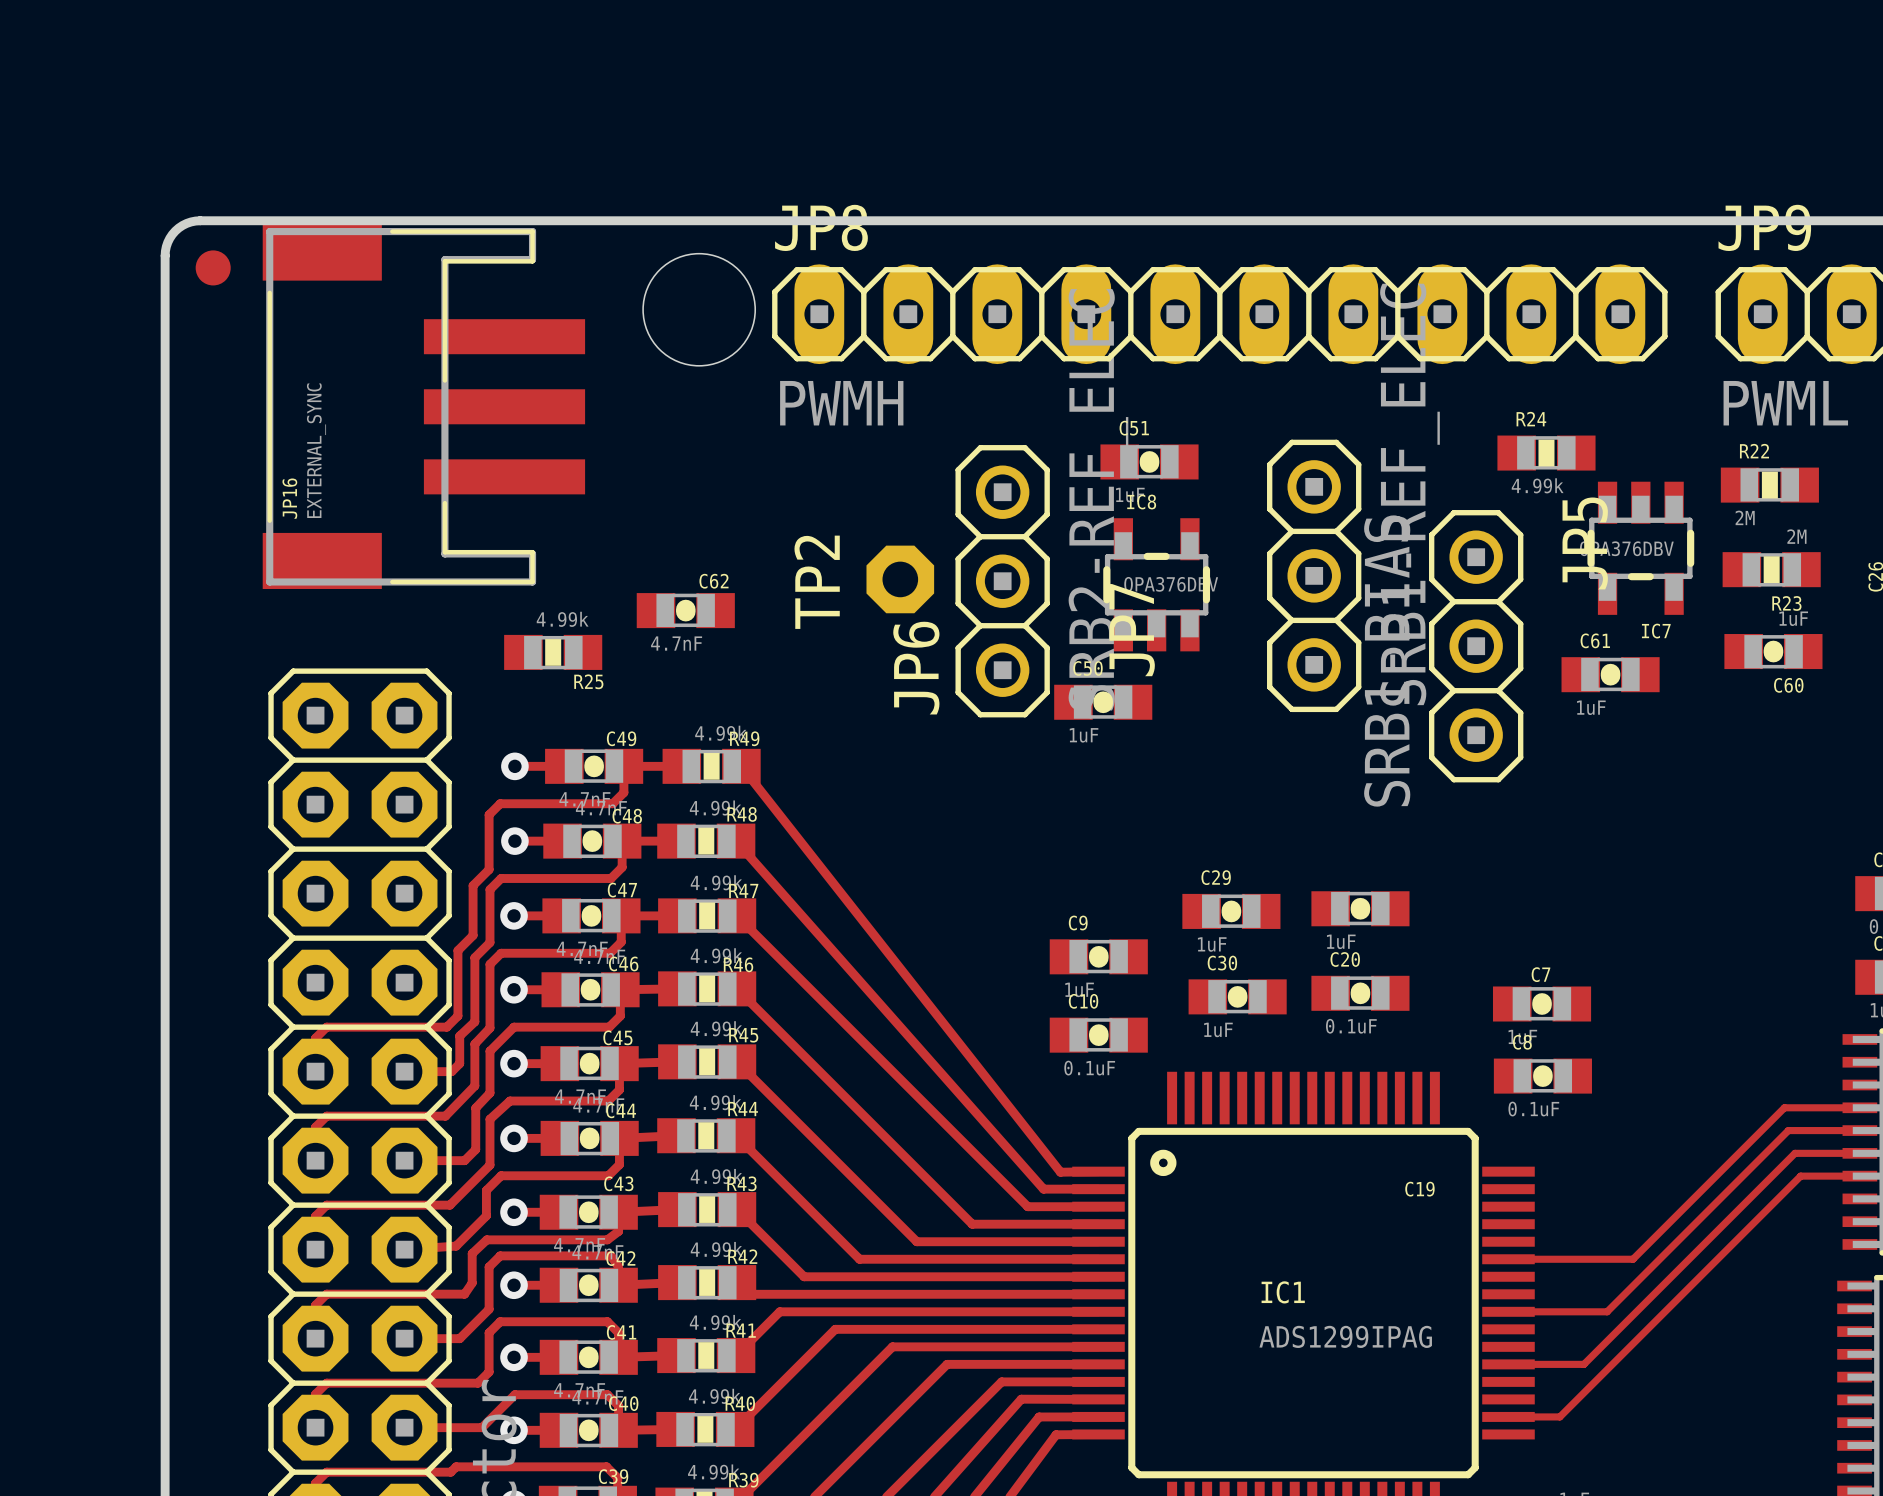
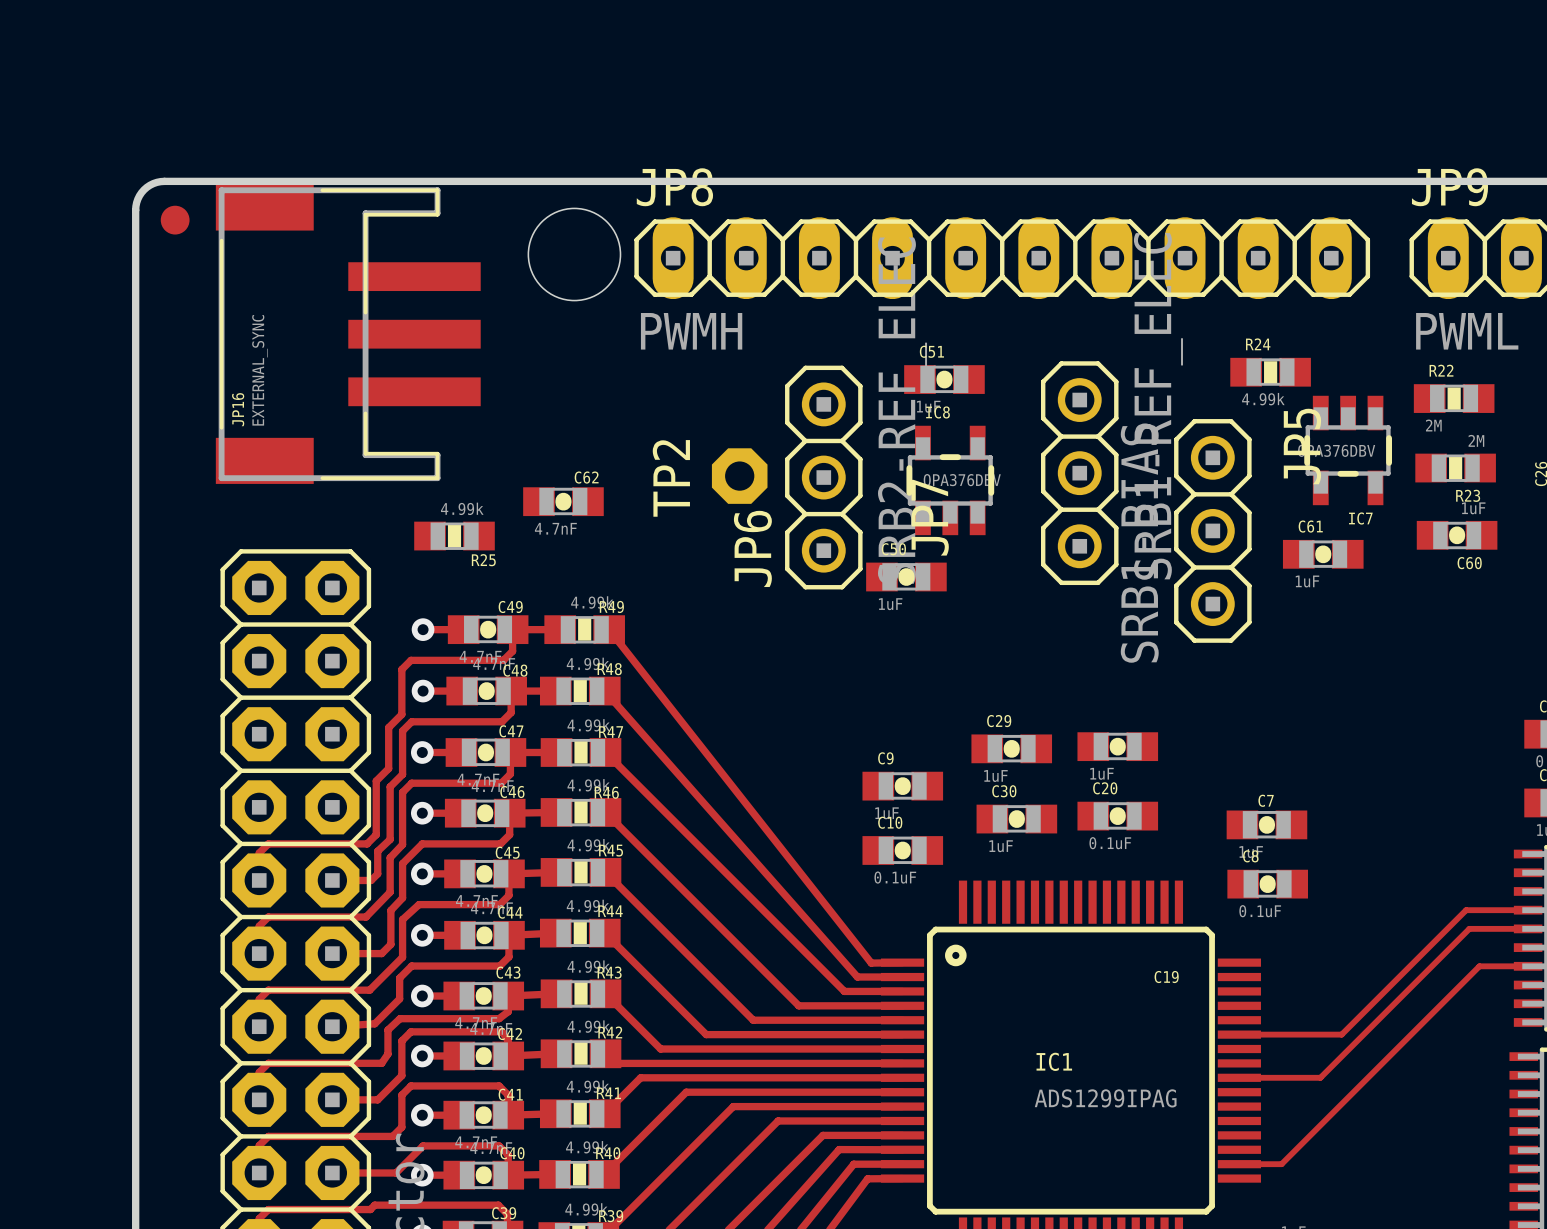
top track: (1859, 1153) (1794, 1153) (1583, 1364) (1508, 1364) -> none

